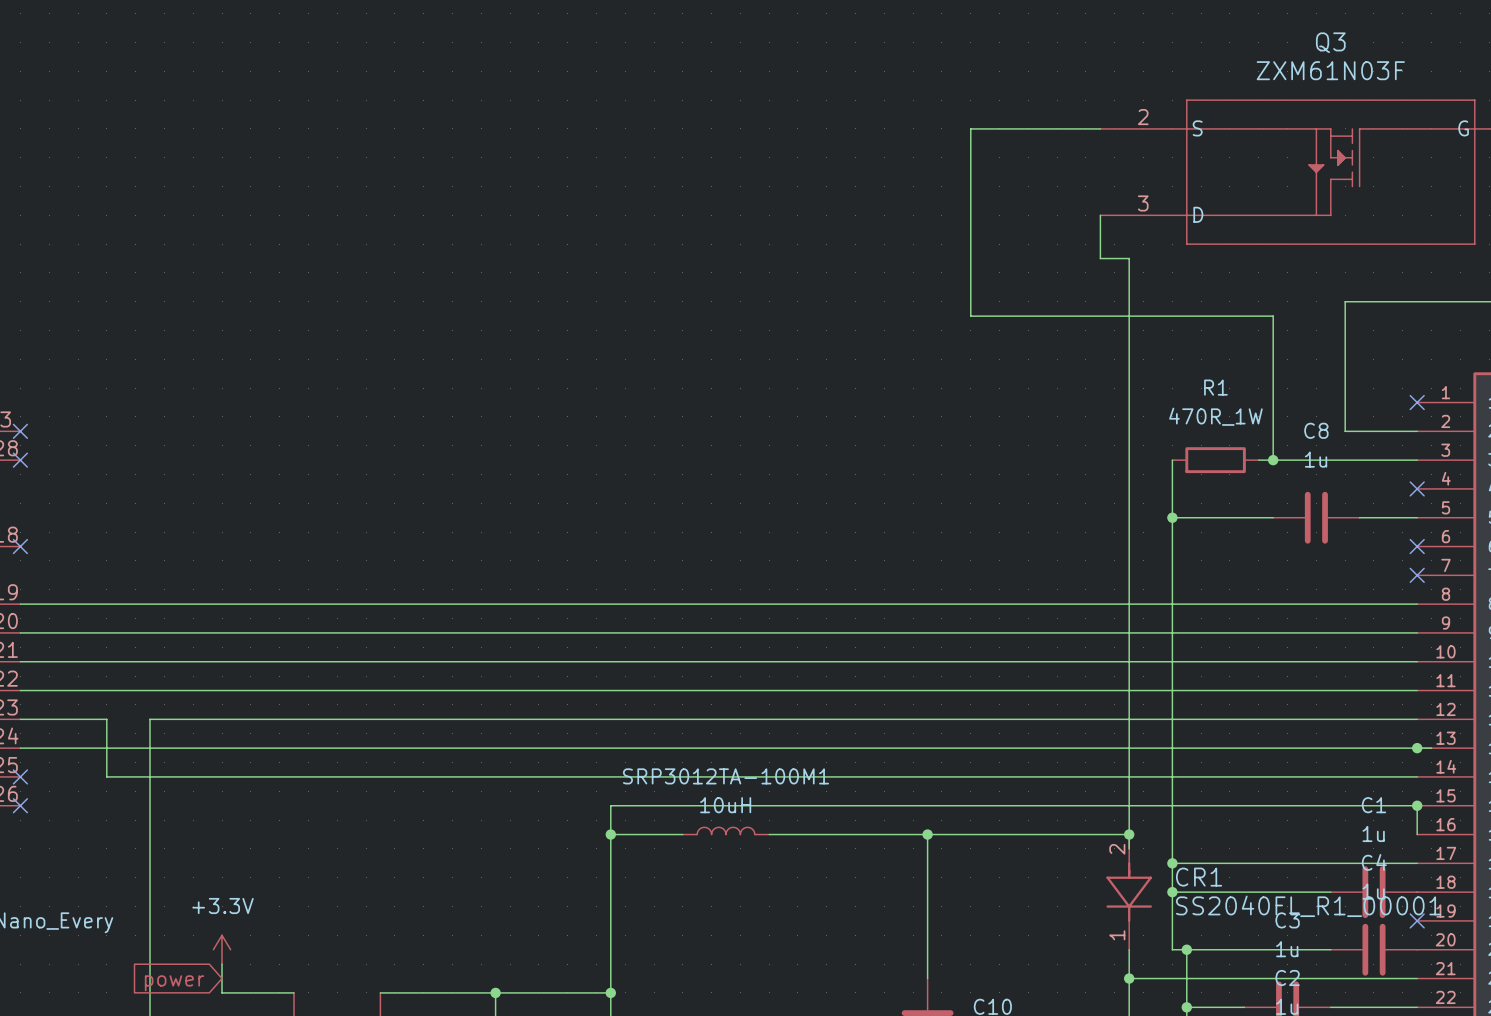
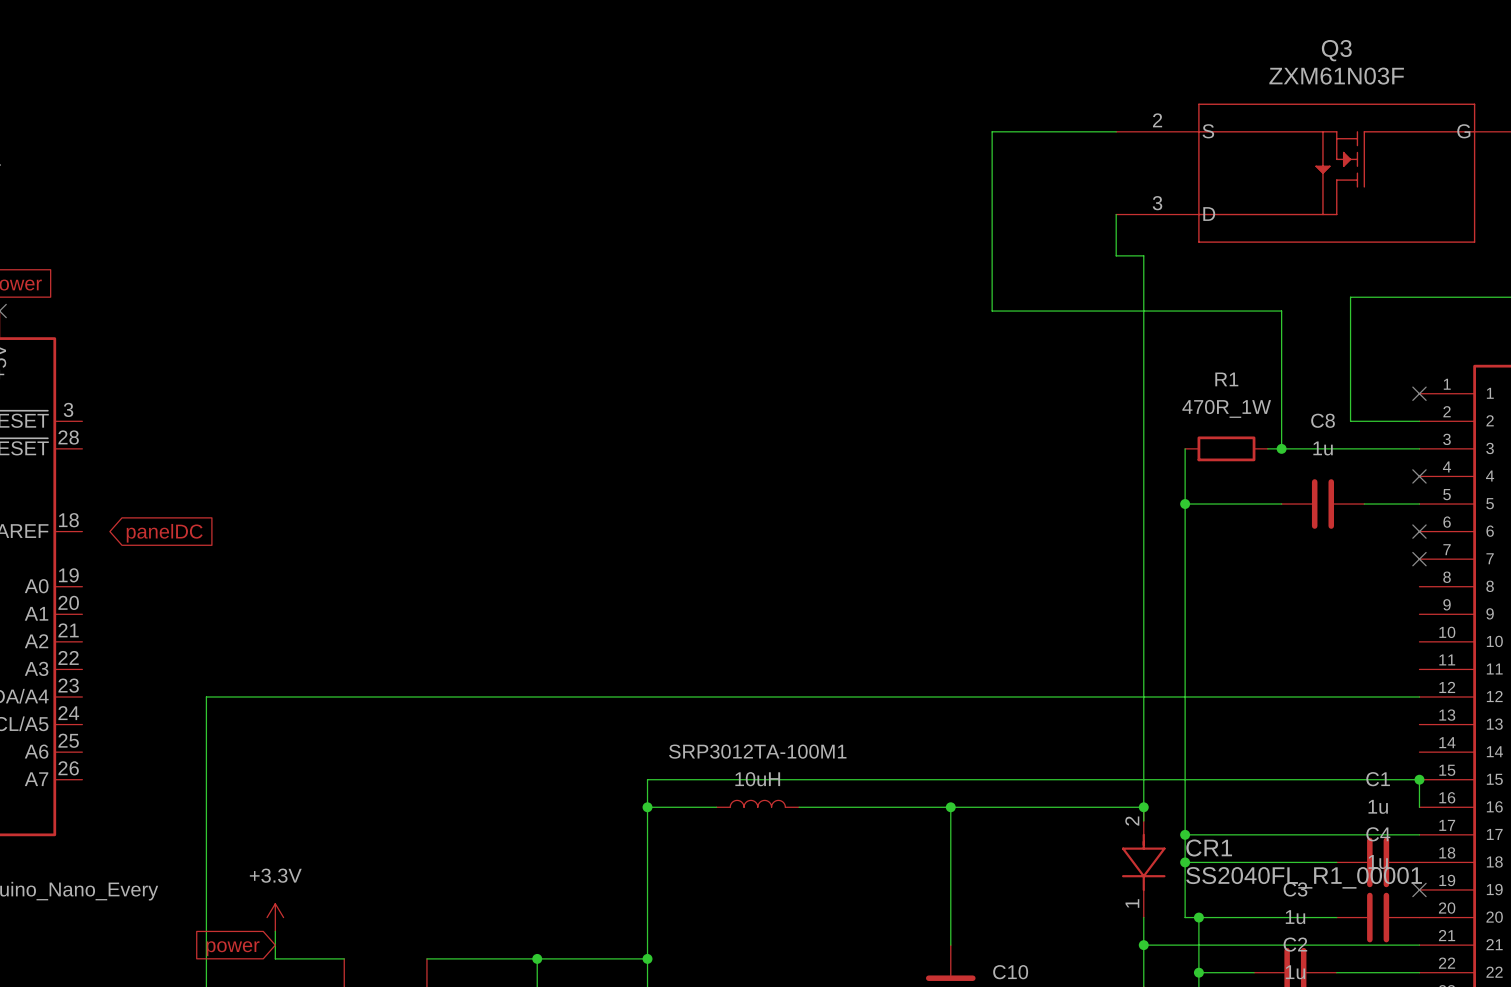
no-connect mark: (20, 431) -> none
no-connect mark: (20, 460) -> none
no-connect mark: (20, 546) -> none
global label: none -> panelDC (164, 533)
wire: (20, 604) (1417, 604) -> none
wire: (20, 632) (1417, 632) -> none
wire: (20, 661) (1417, 661) -> none
wire: (20, 690) (1417, 690) -> none
wire: (20, 719) (106, 719) (106, 776) (1417, 776) -> none
wire: (20, 748) (1431, 748) -> none
junction: (1417, 748) -> none
no-connect mark: (20, 776) -> none
no-connect mark: (20, 805) -> none

